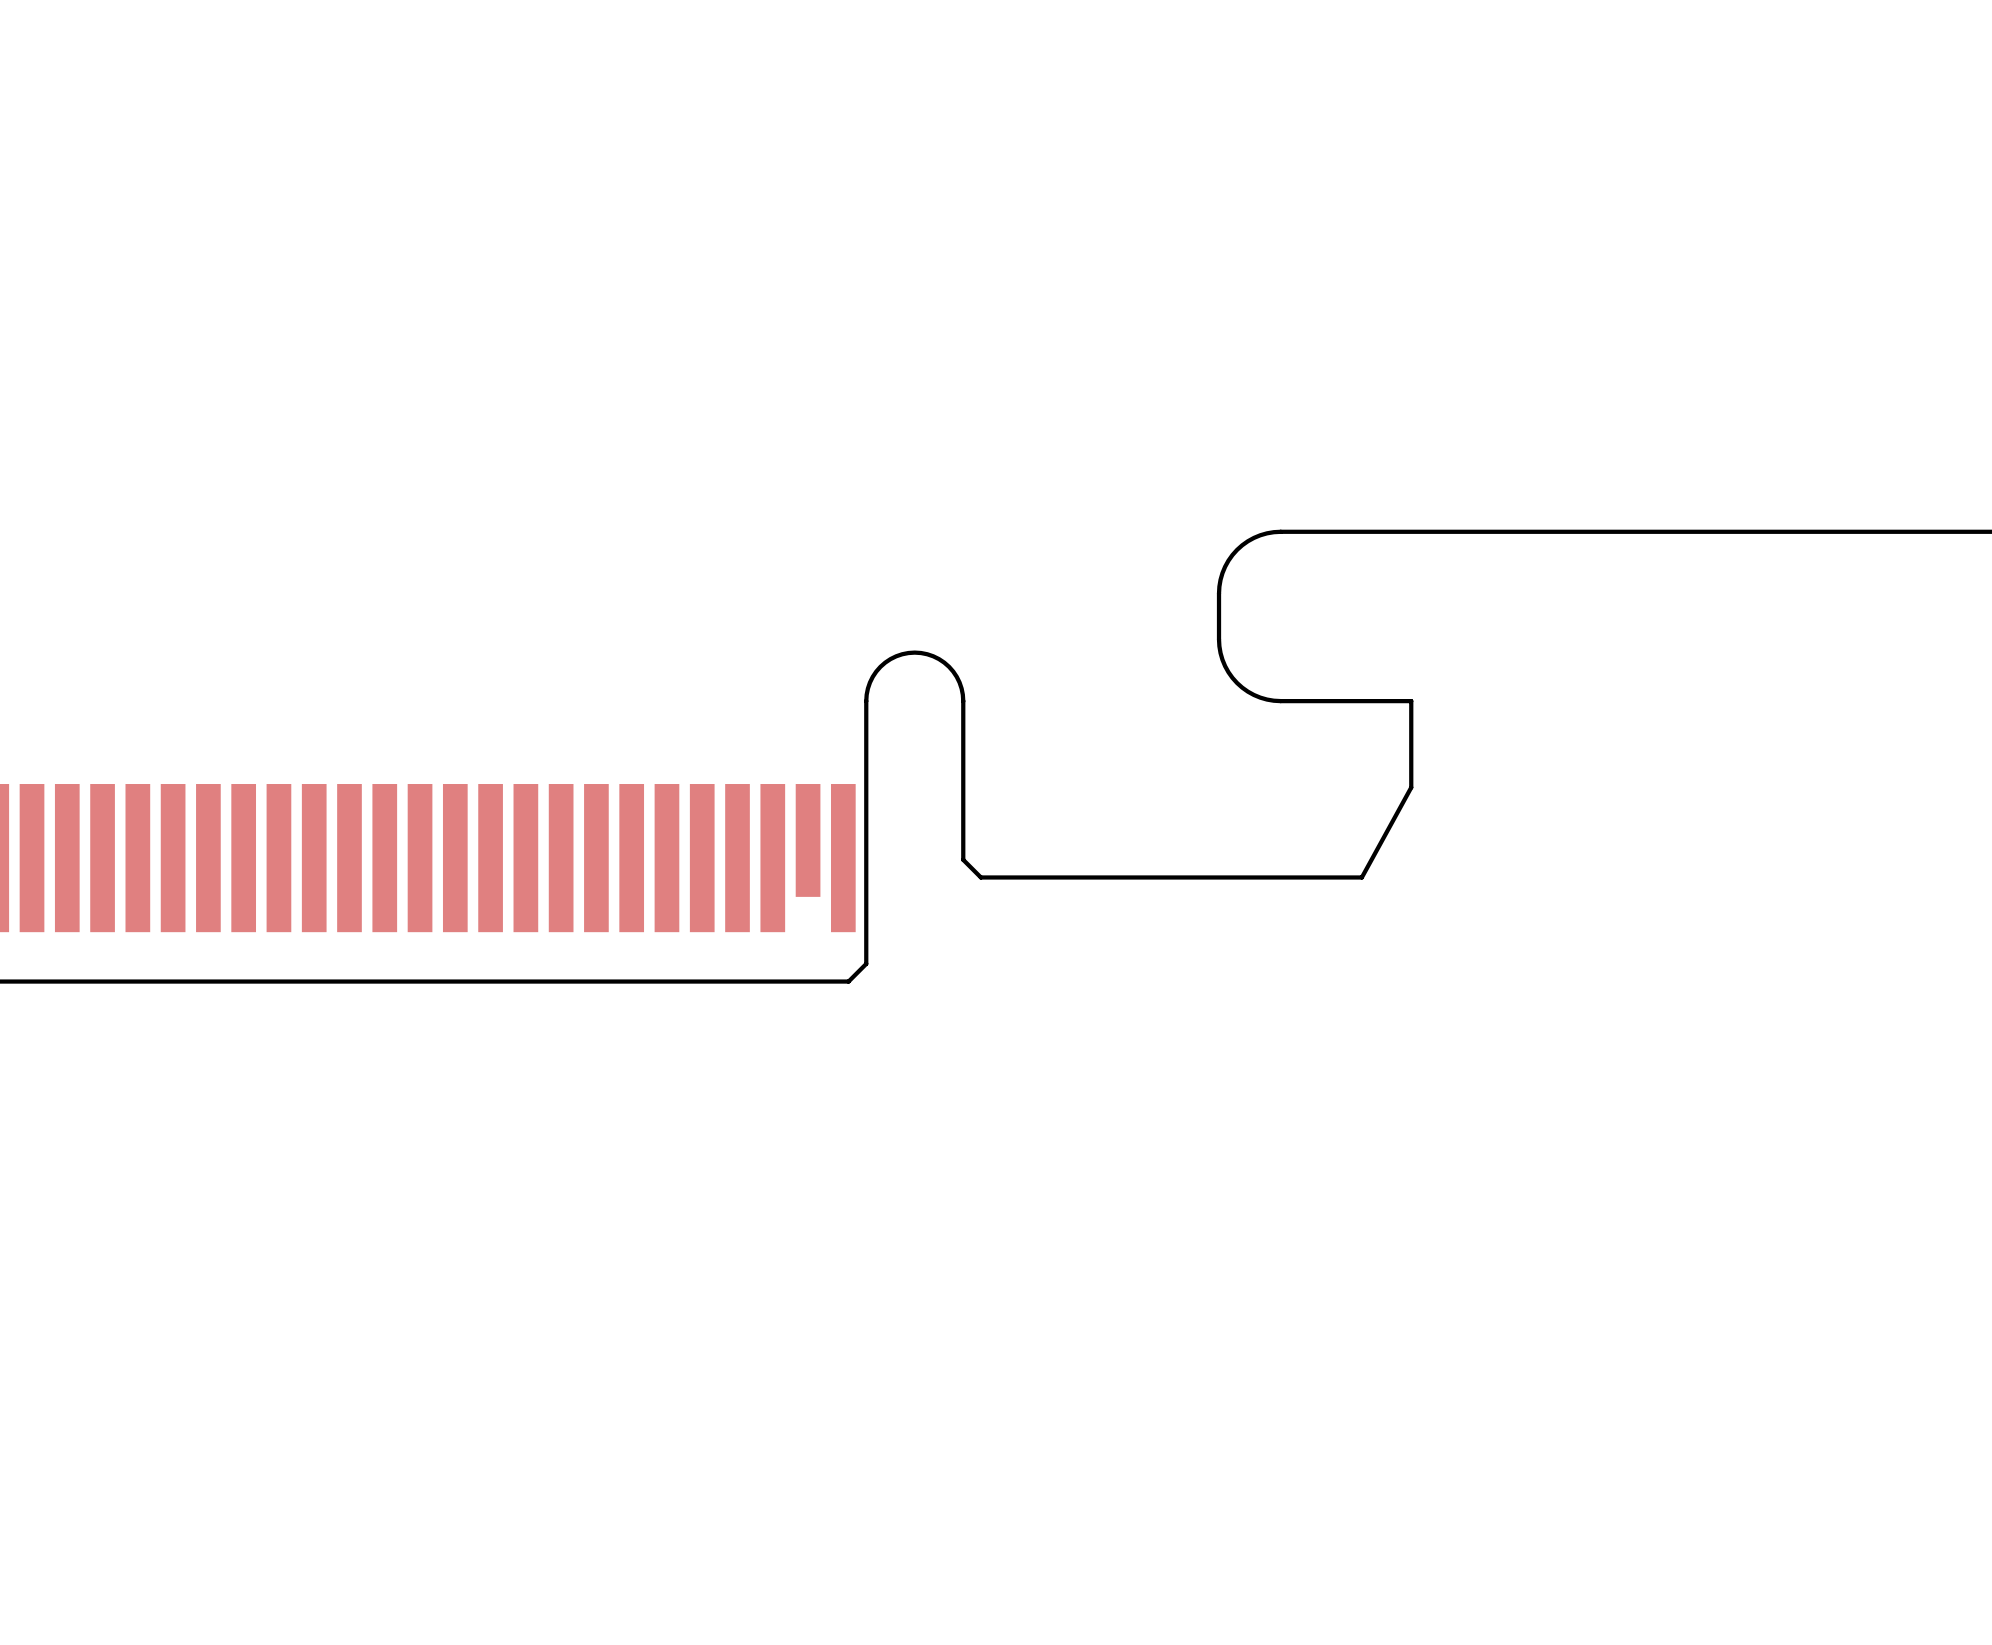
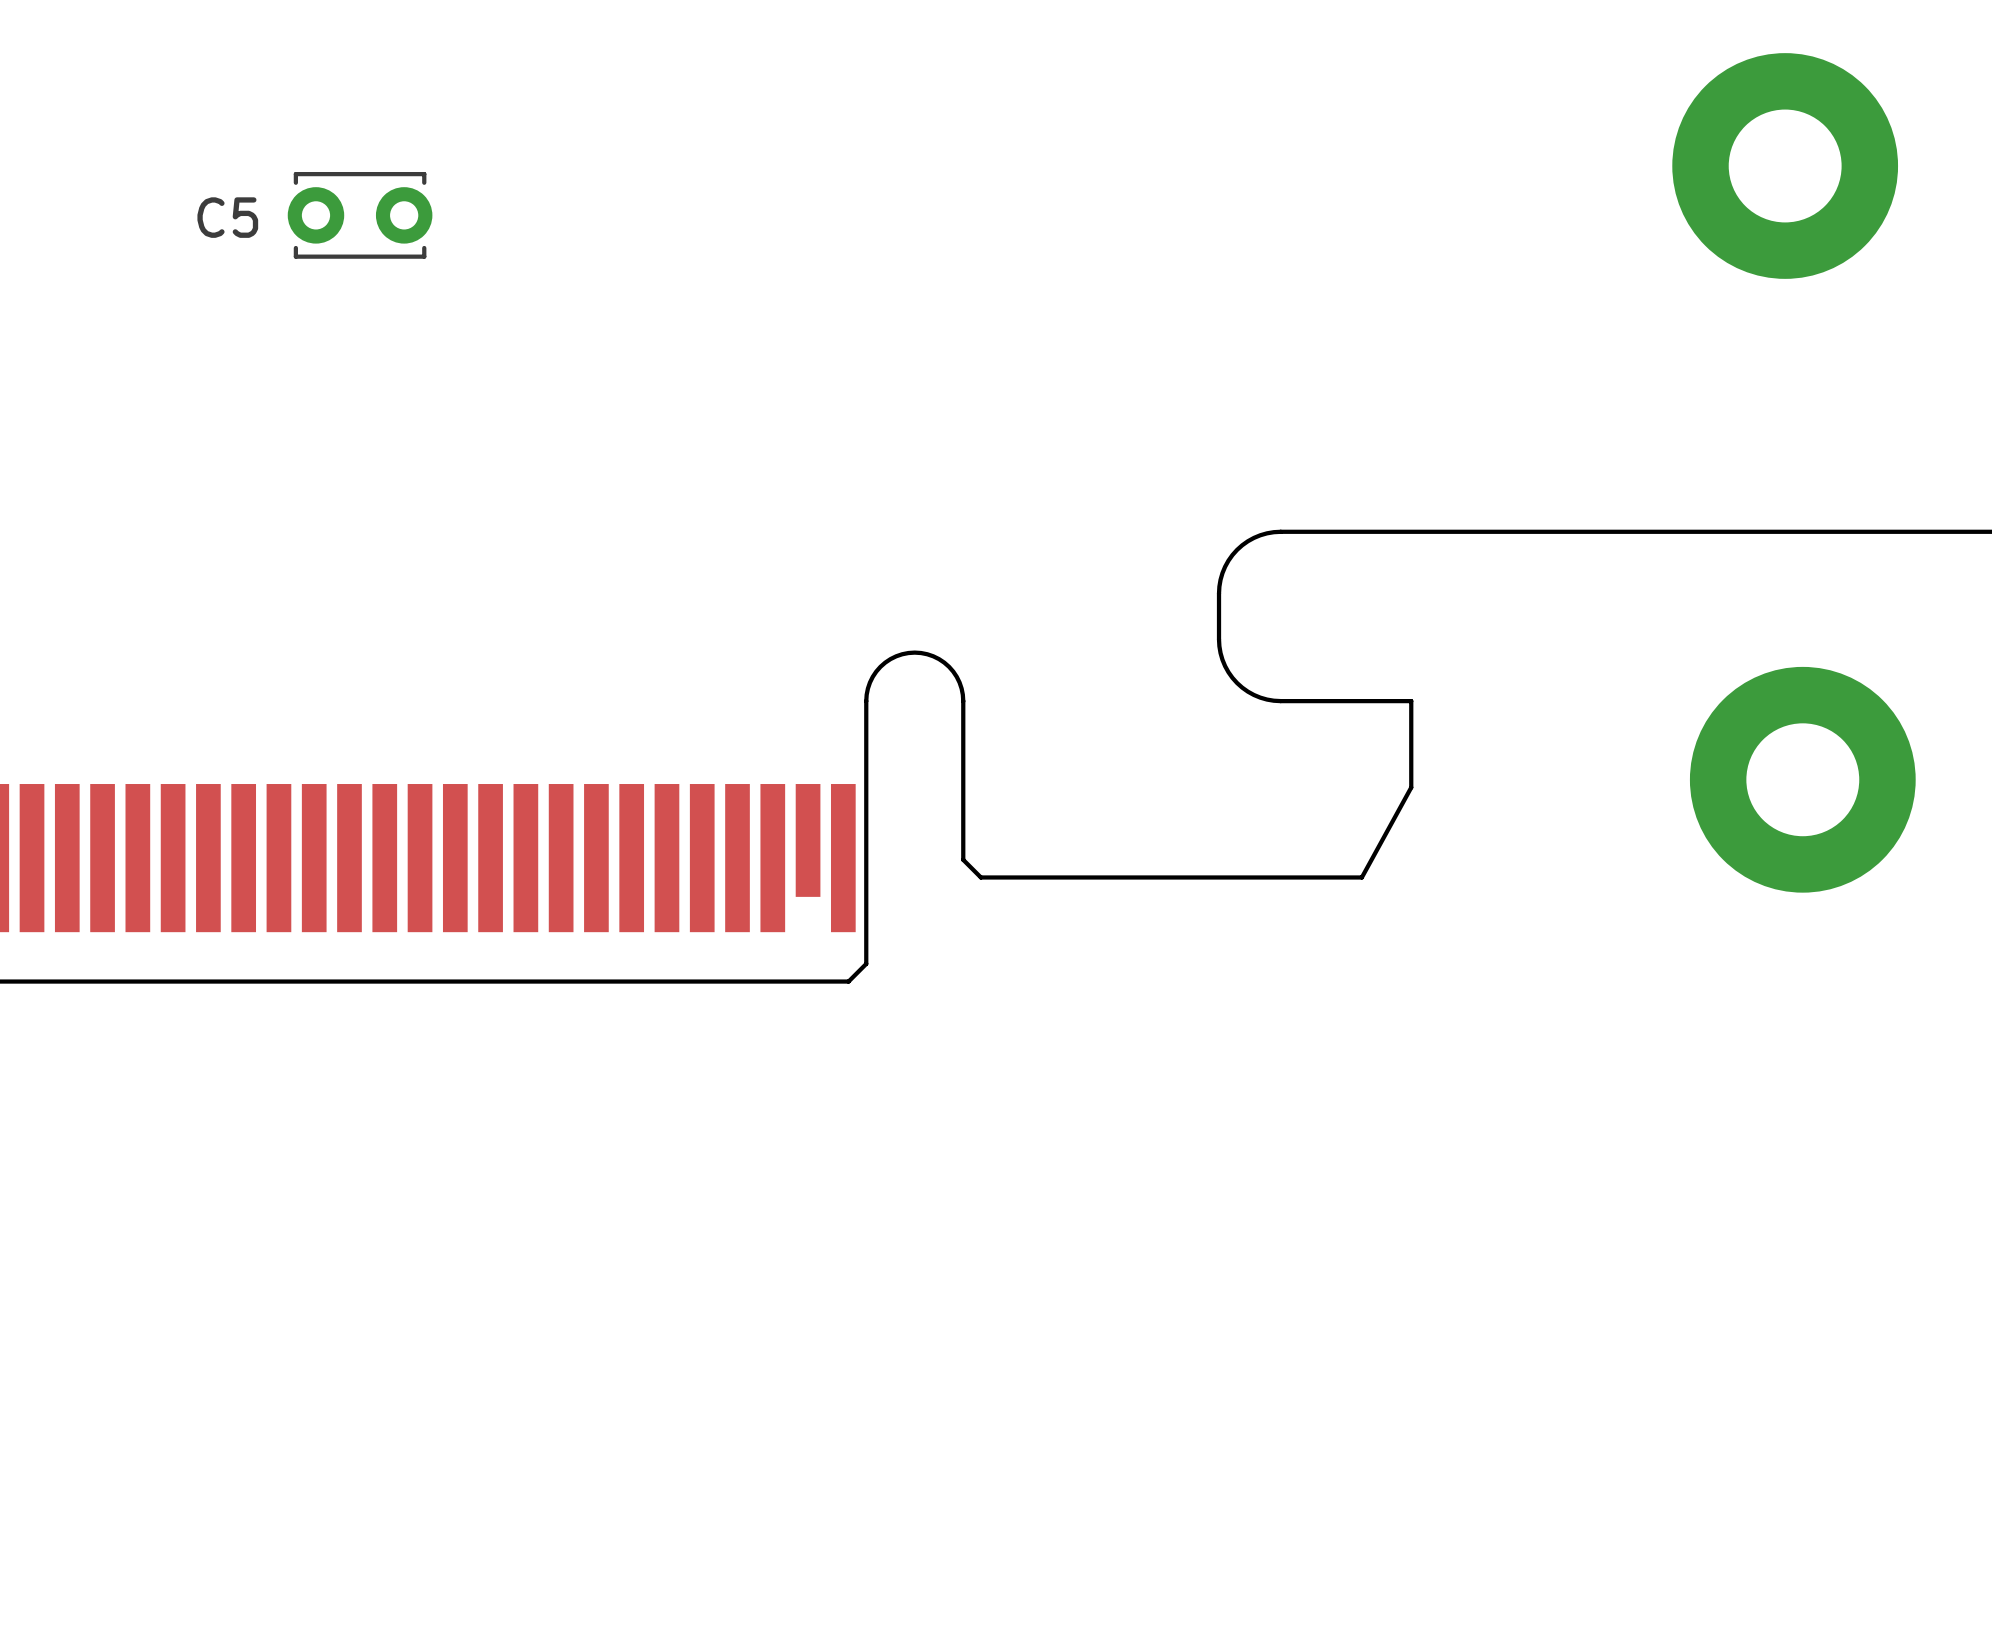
part: none -> (1785, 165)
C5: none -> (360, 215)
part: none -> (1802, 779)

